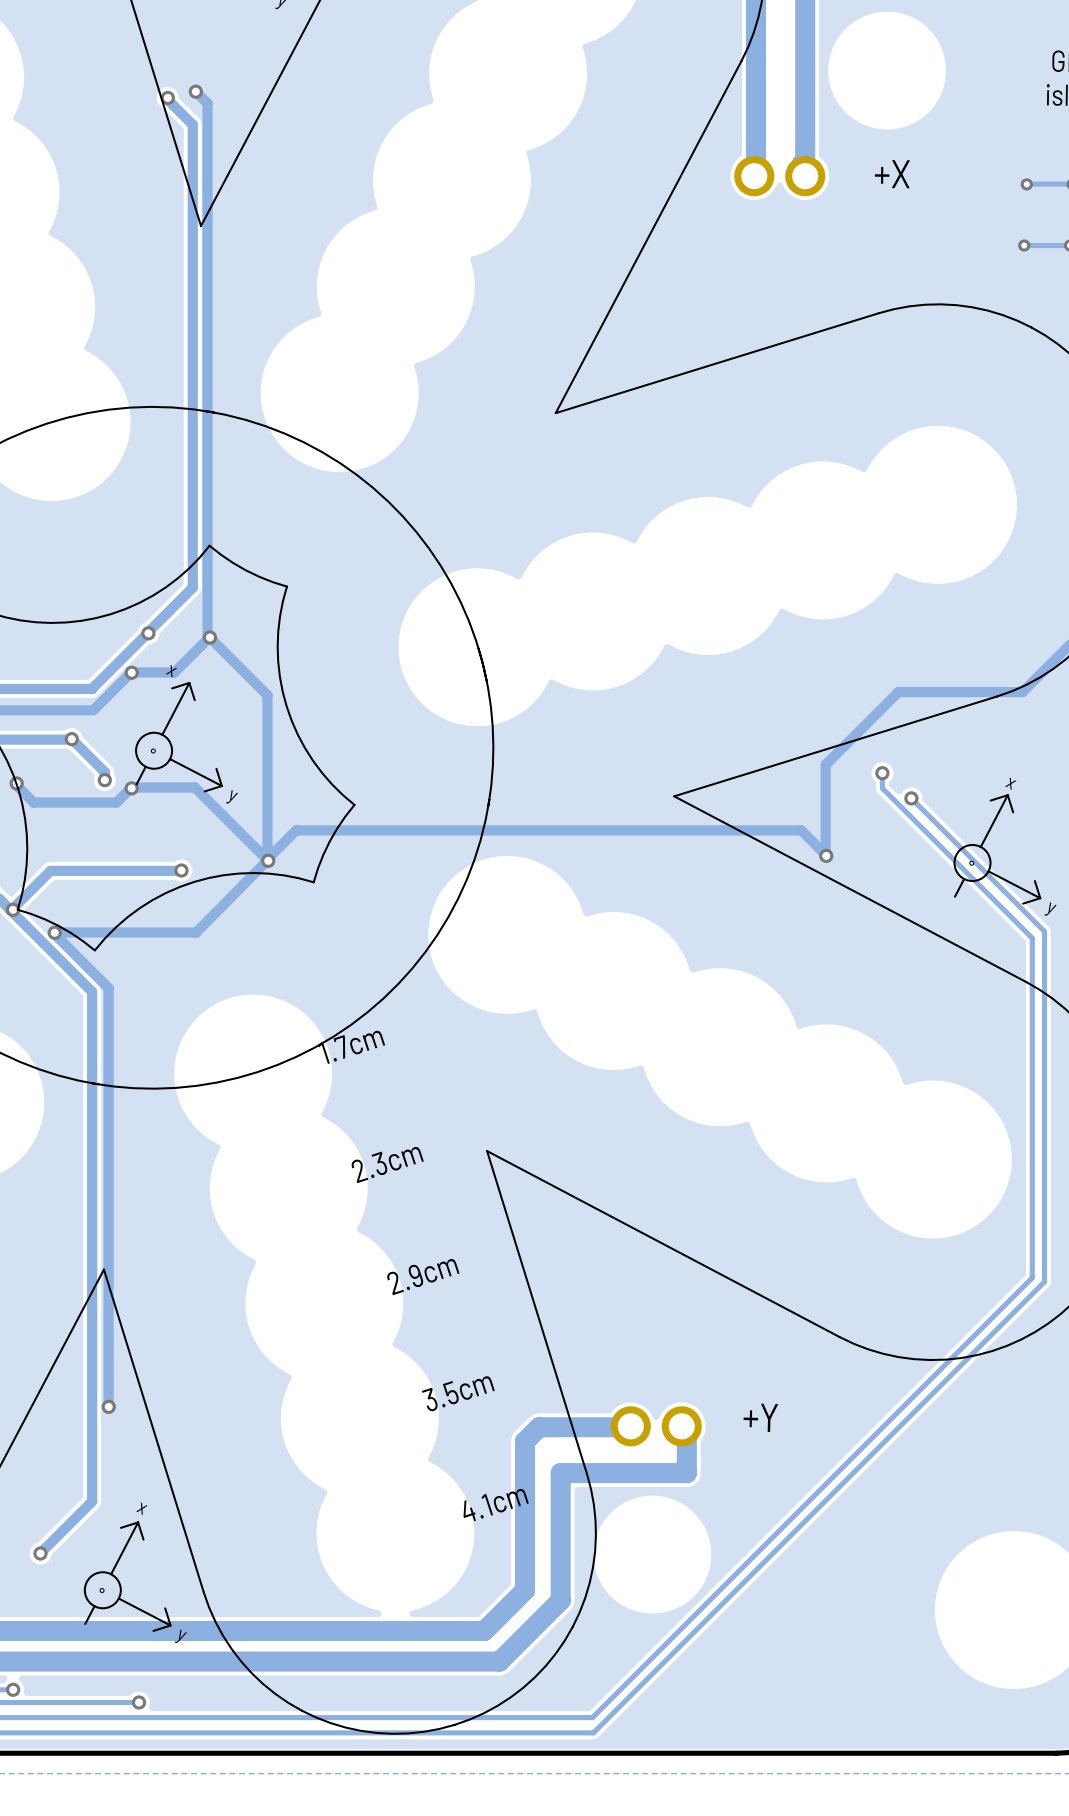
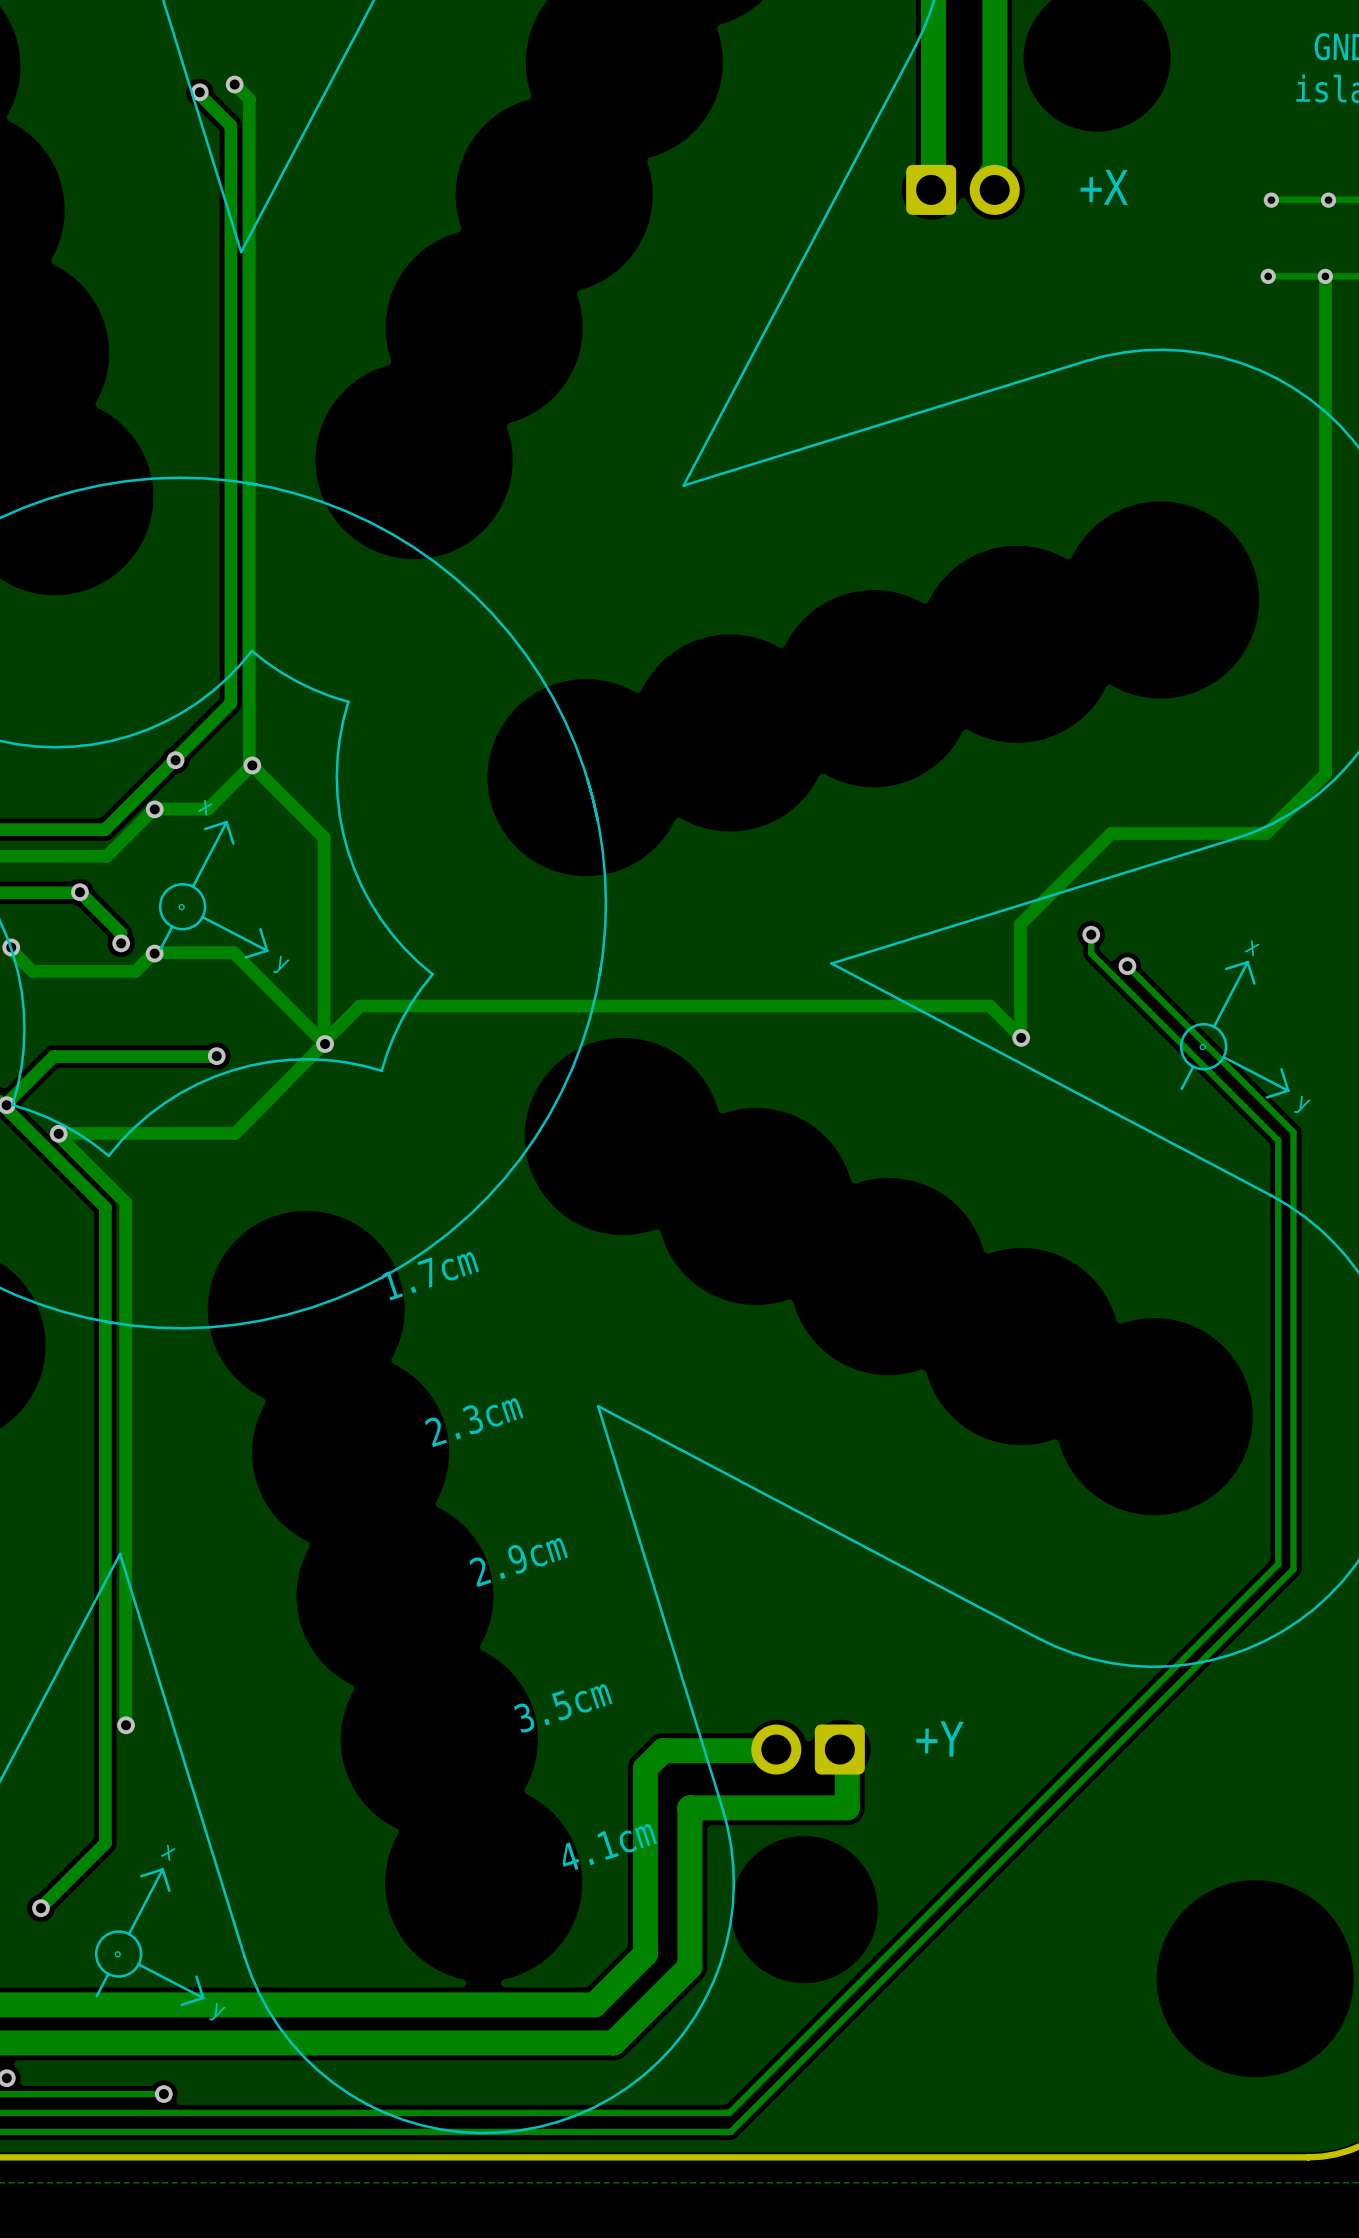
part footprint: [734, 156, 826, 197] -> [906, 164, 1020, 215]
part footprint: [610, 1406, 702, 1447] -> [751, 1724, 865, 1775]

